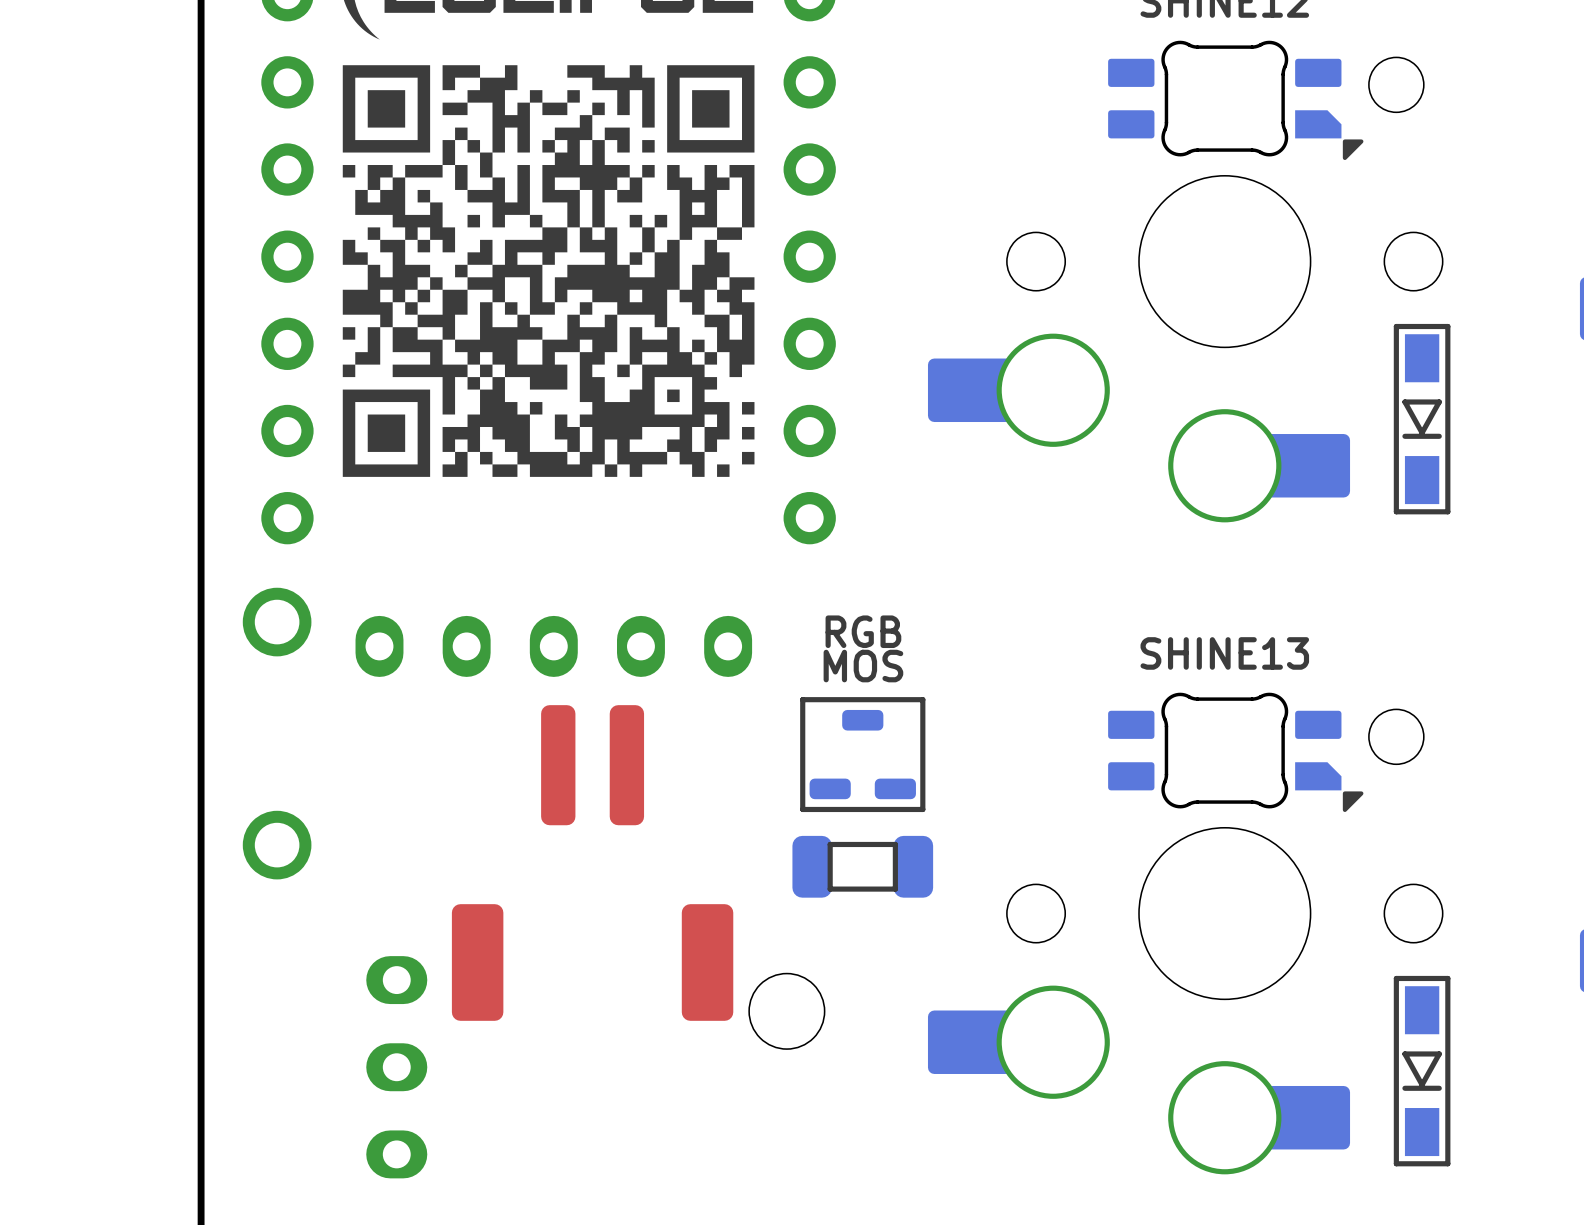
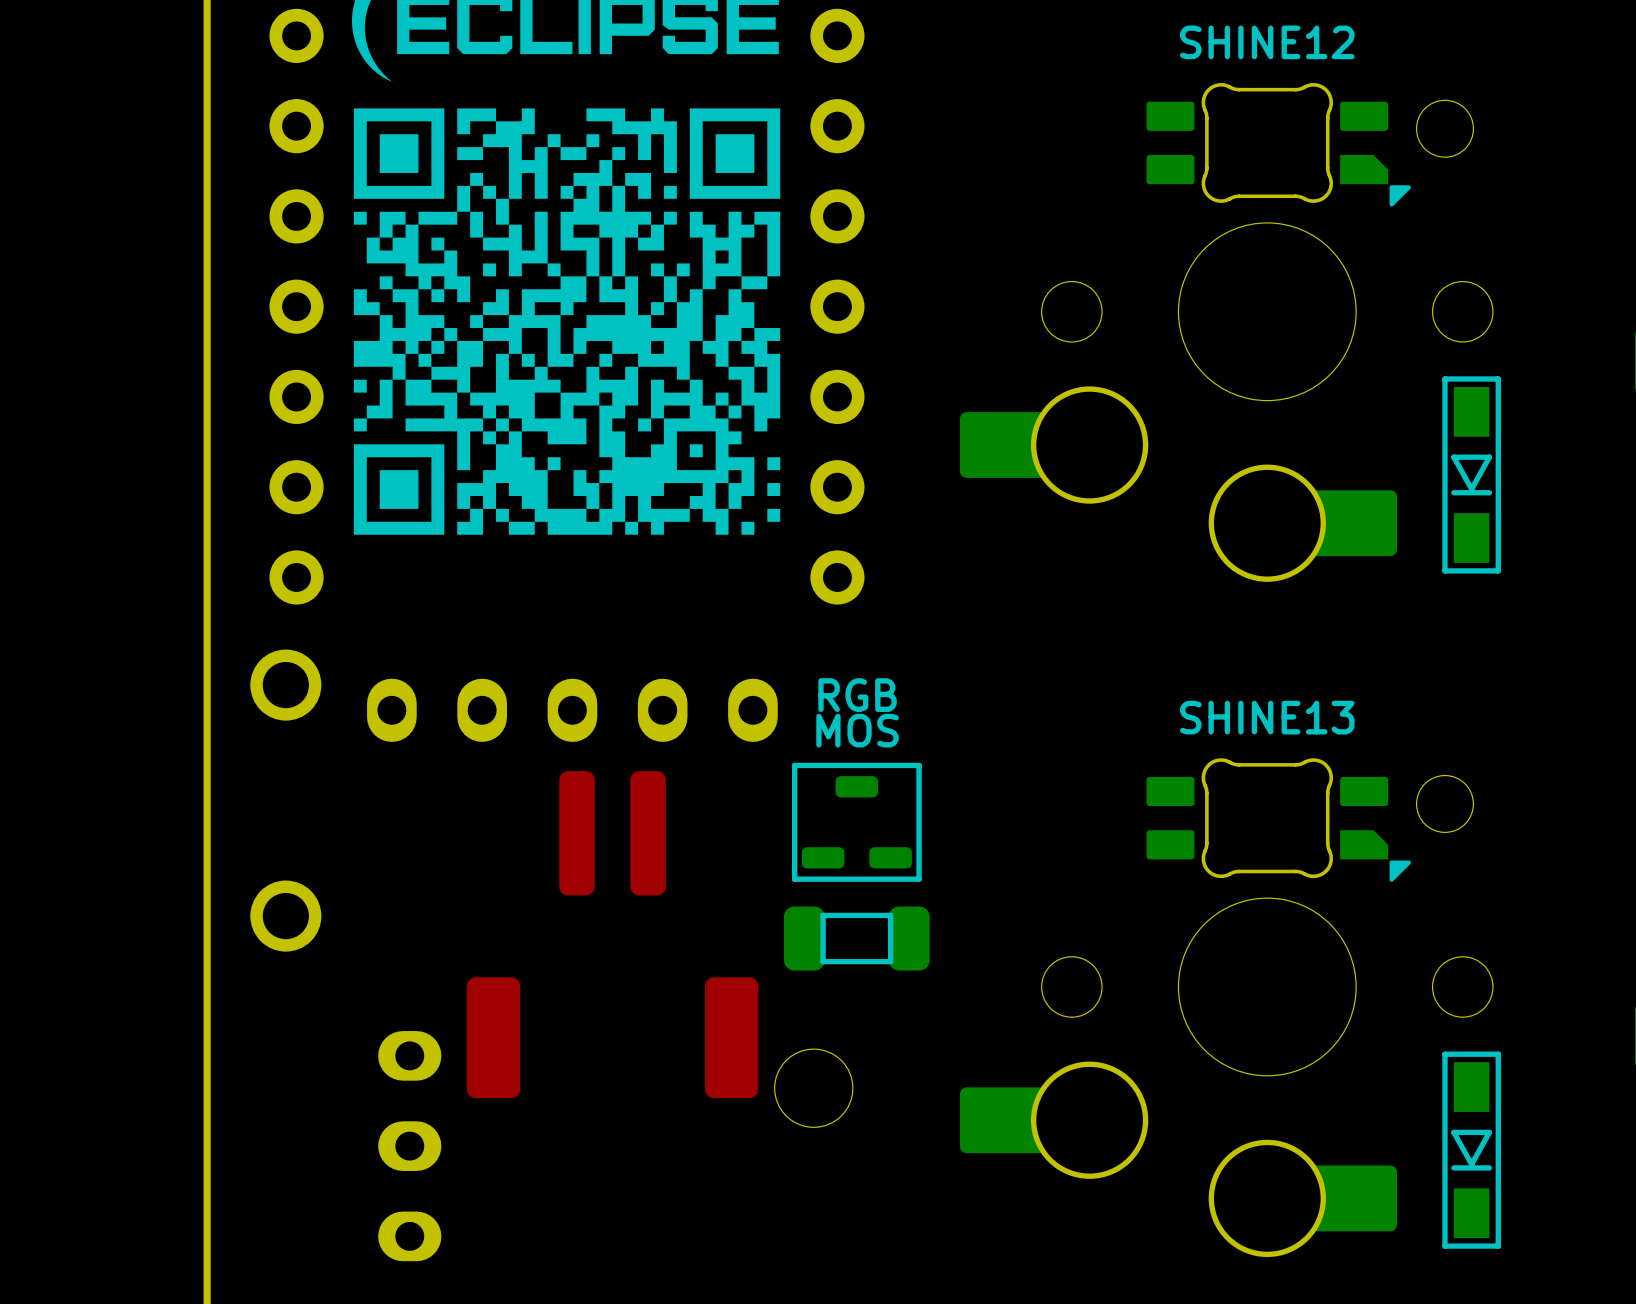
part position: (862, 754) -> (856, 822)
part position: (862, 866) -> (856, 938)

